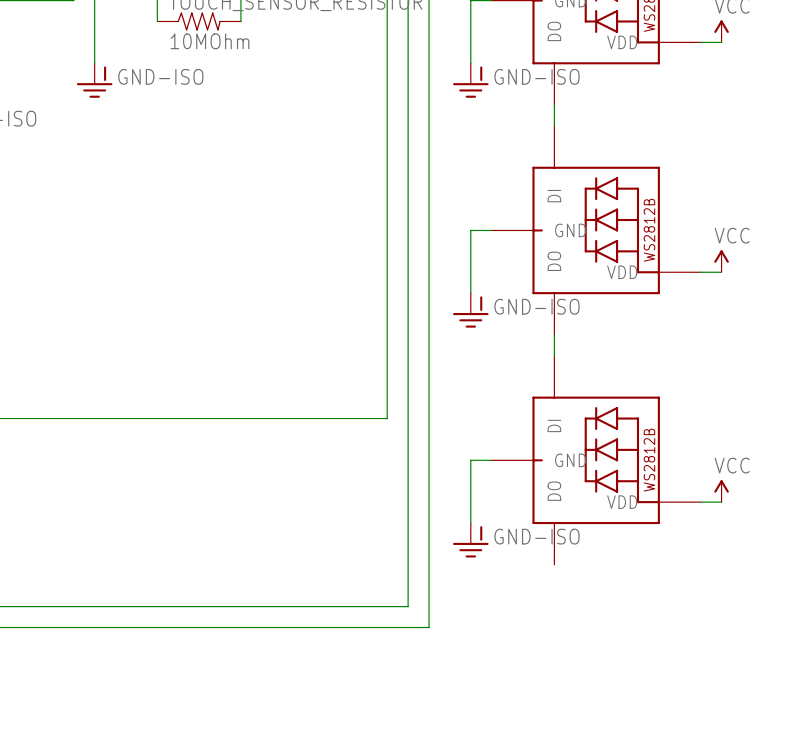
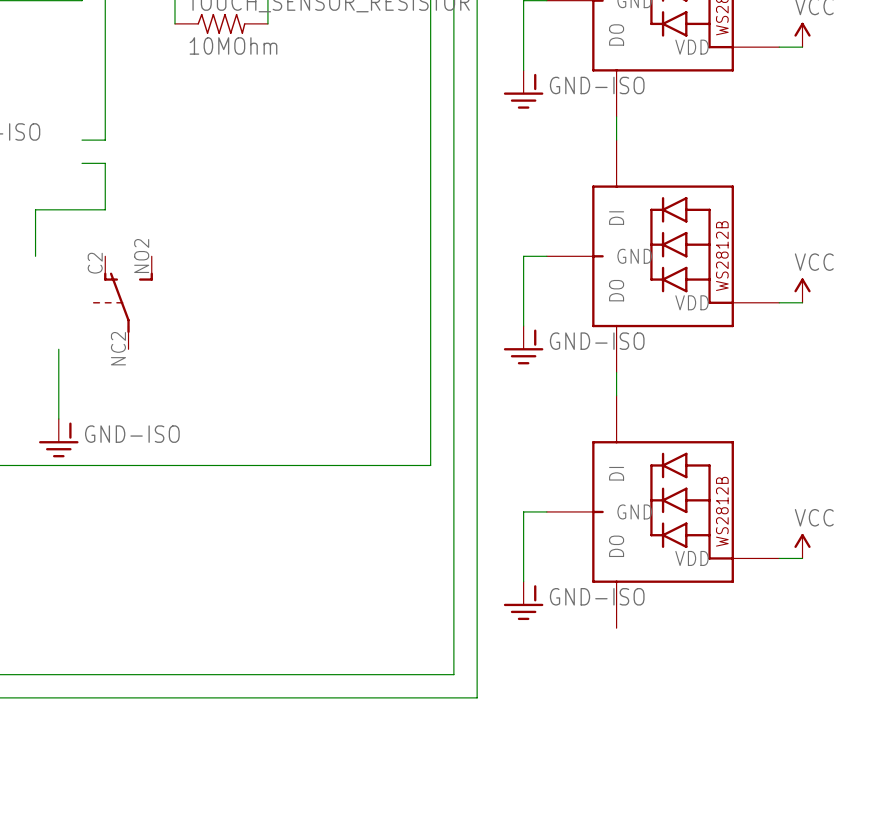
wire: none -> (105, 70) (105, 140) (82, 140)
power symbol: GND-ISO (94, 80) -> none
wire: none -> (82, 163) (105, 163) (105, 209) (35, 209) (35, 256)
part: none -> (122, 302)
wire: none -> (58, 349) (58, 419)
power symbol: none -> GND-ISO (58, 438)

